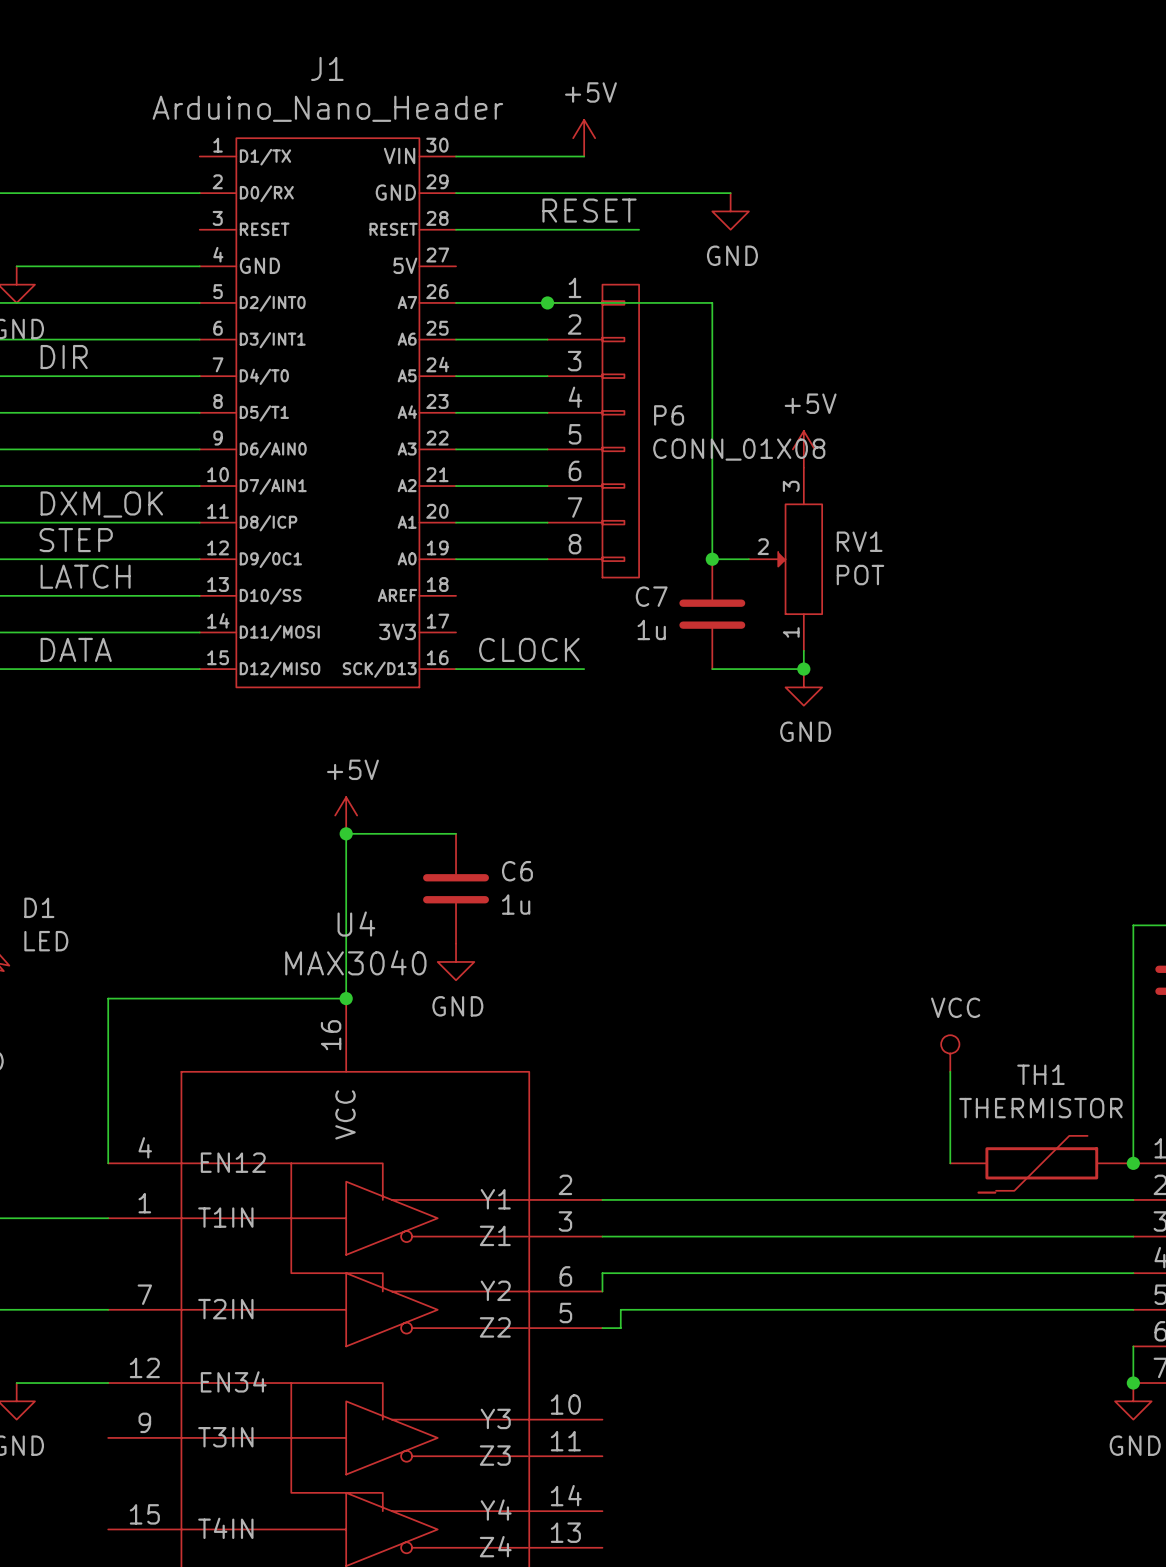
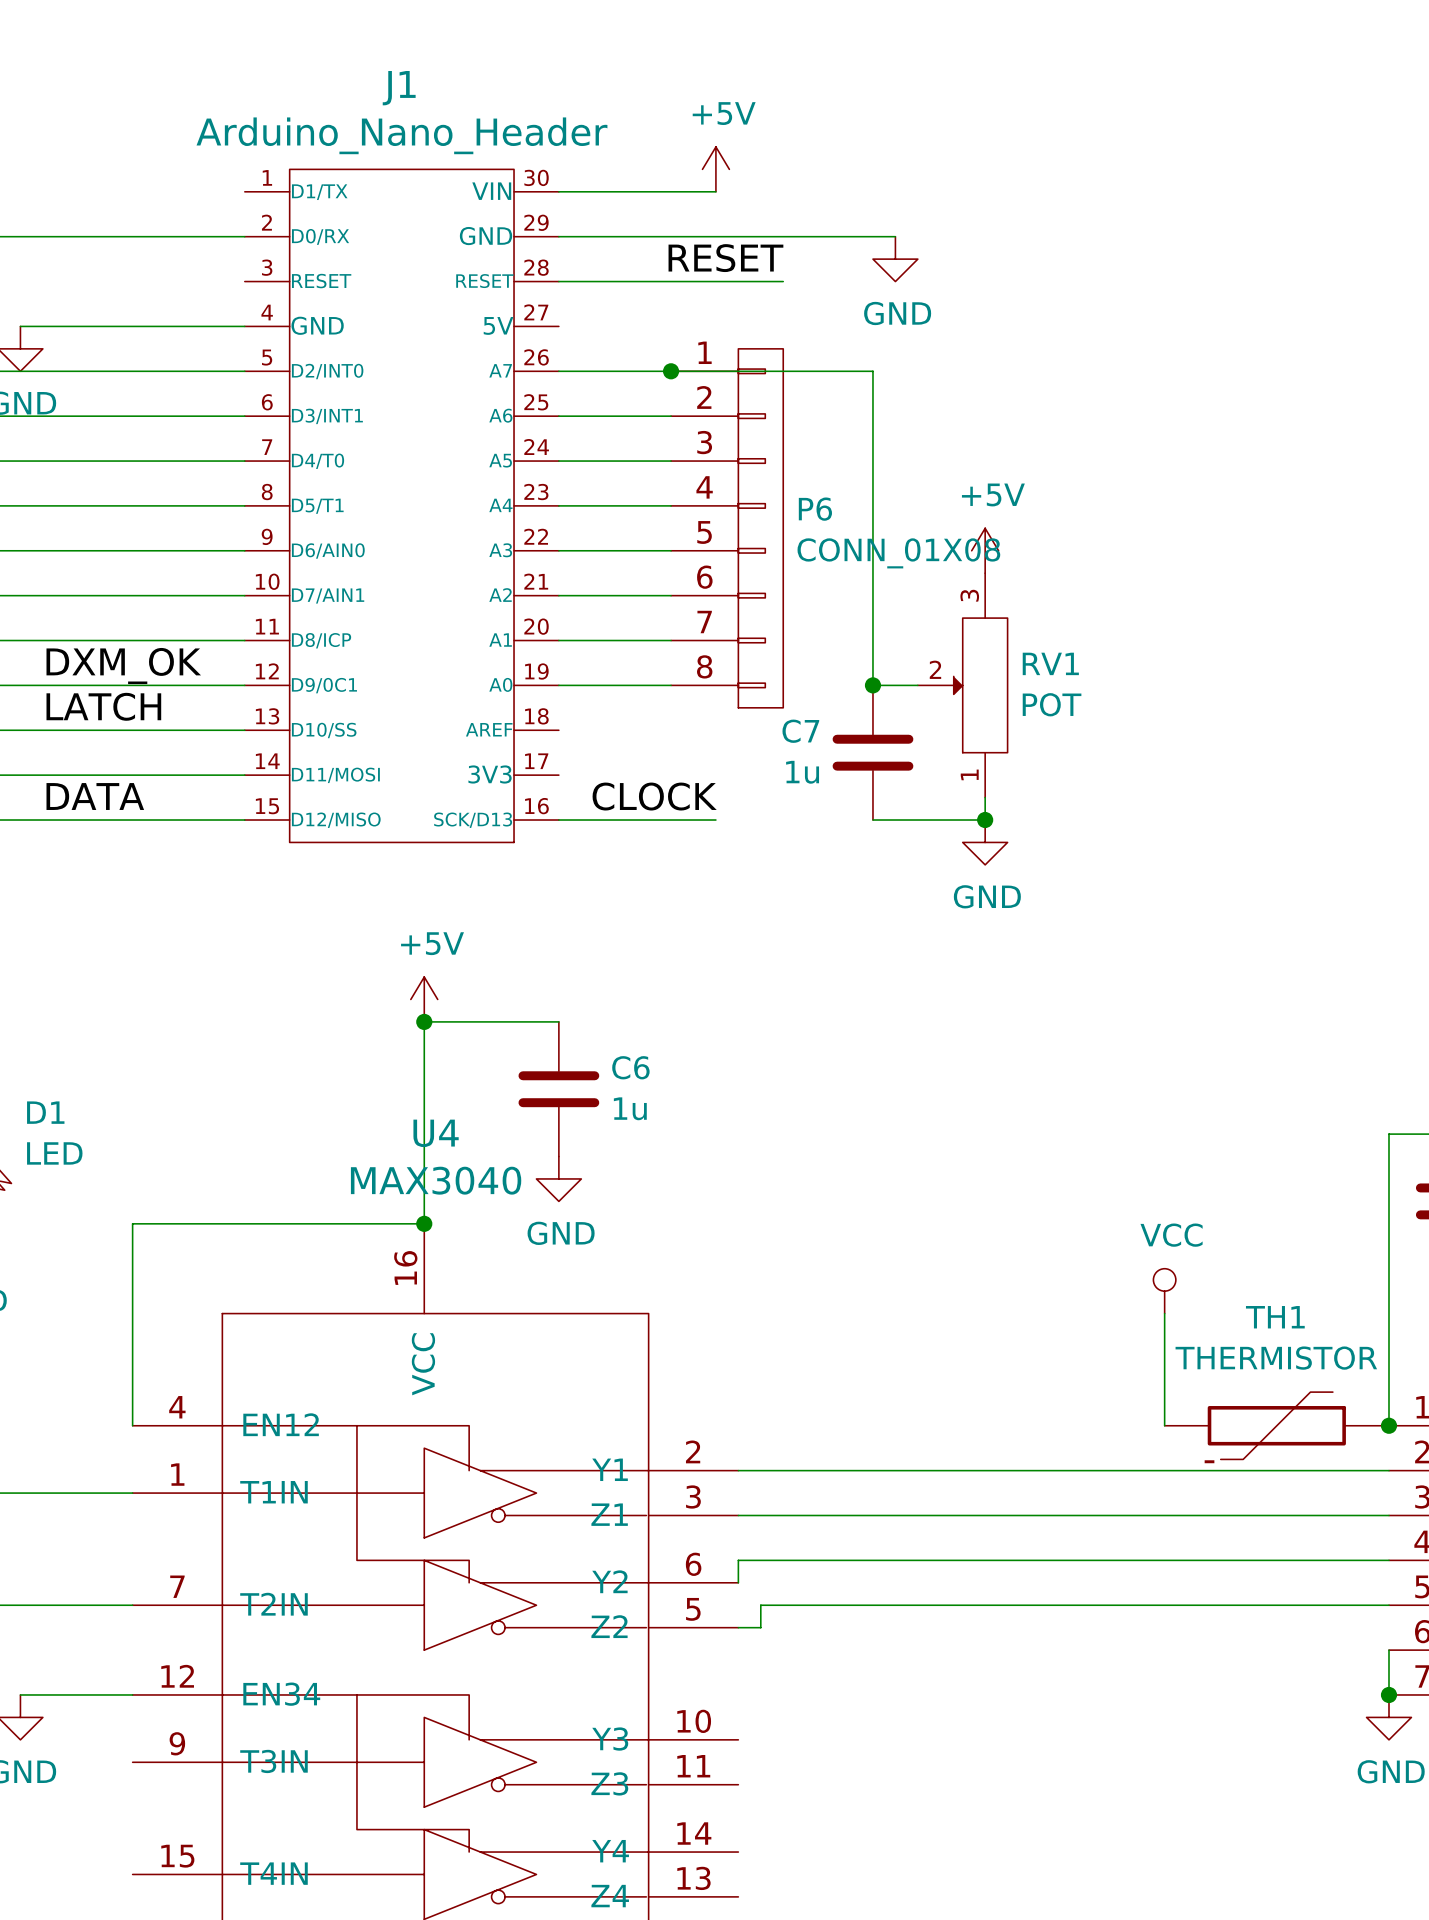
label: DIR (64, 357) -> none
label: DXM_OK (101, 504) -> none
label: STEP (76, 540) -> DXM_OK (123, 666)

